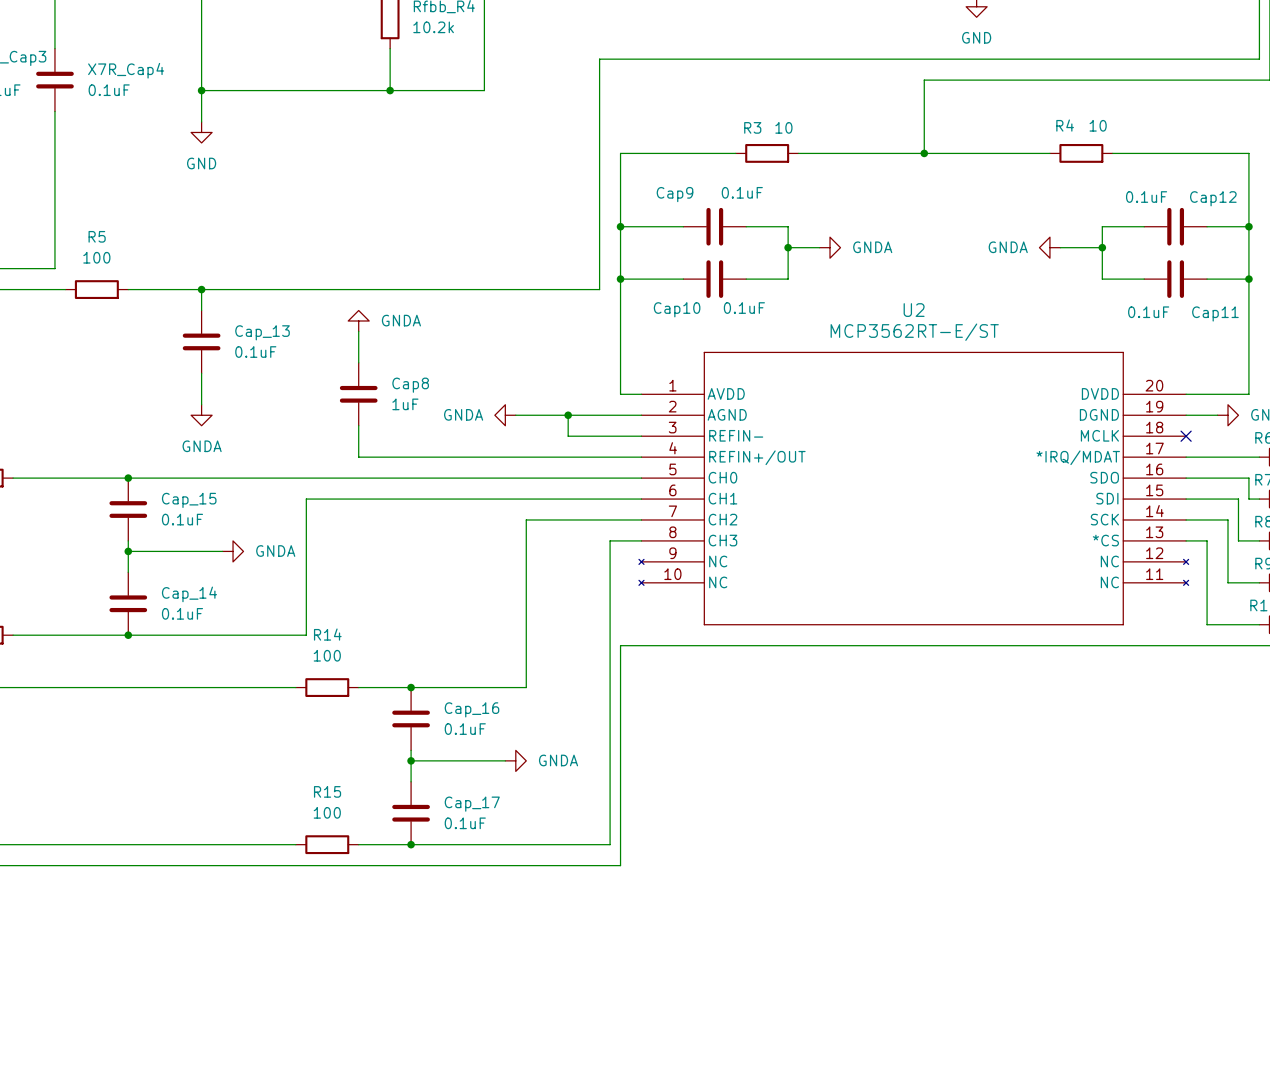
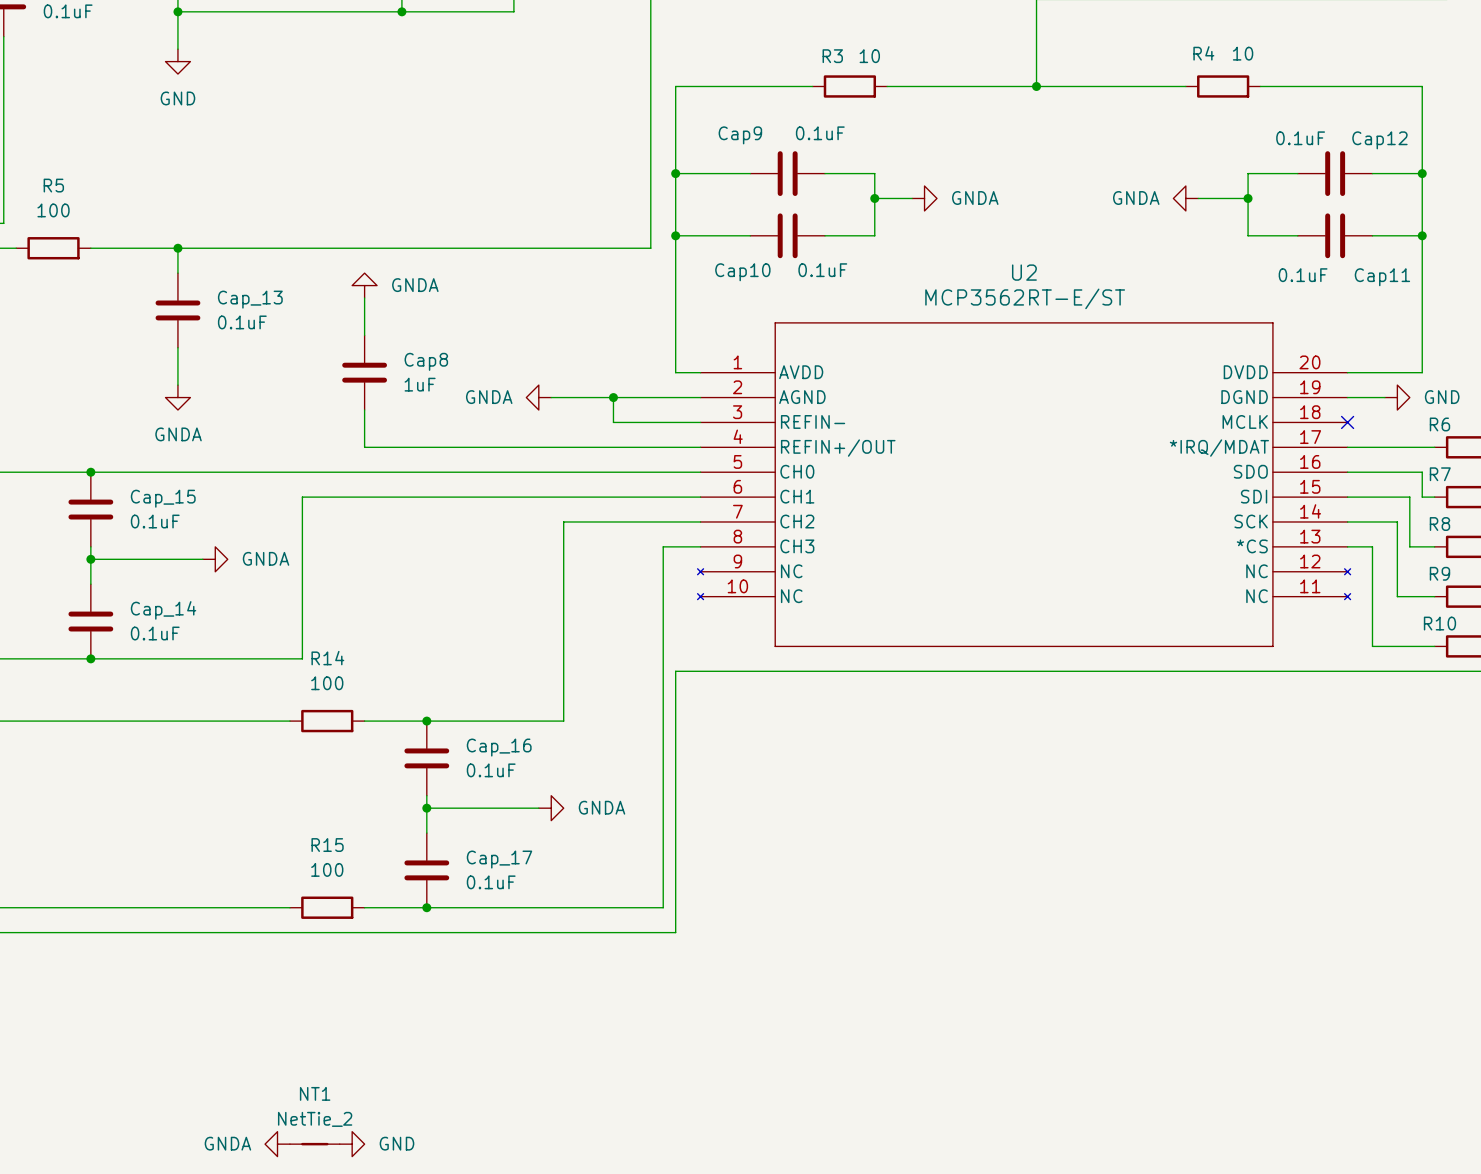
power symbol: none -> GNDA (277, 1144)
NT1: none -> NetTie_2 (314, 1144)
power symbol: none -> GND (352, 1144)

